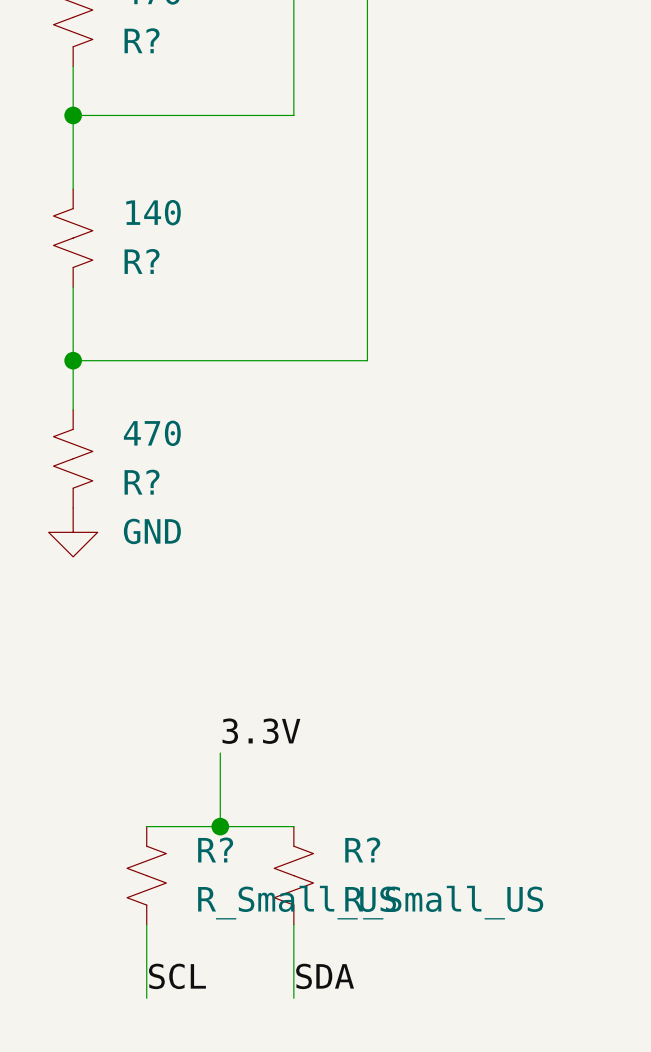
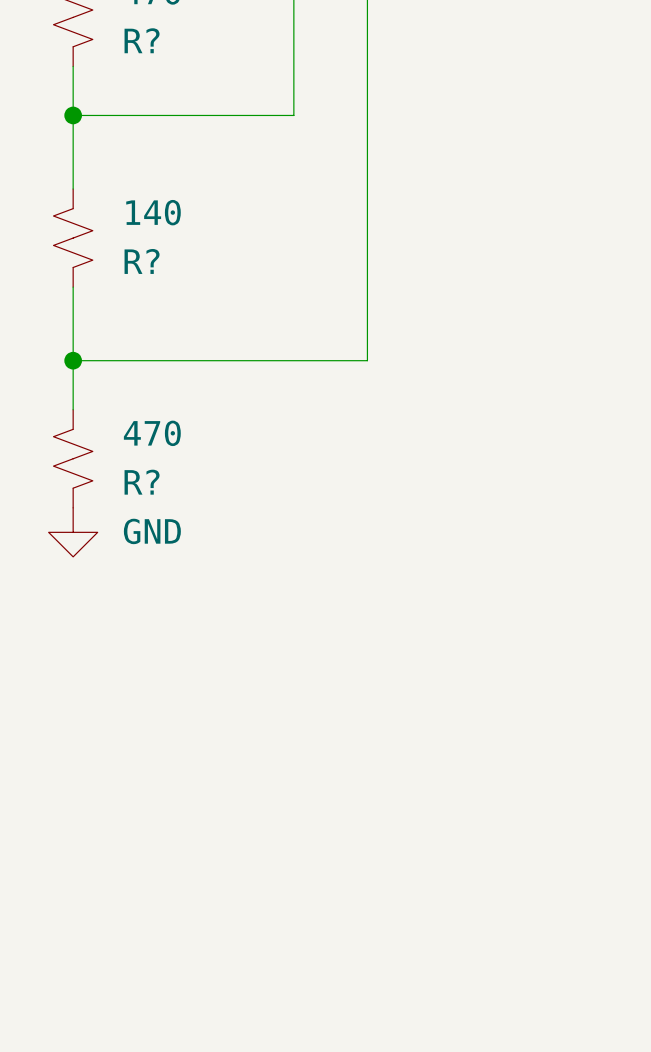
label: 3.3V (261, 731) -> none
wire: (220, 753) (220, 826) -> none
wire: (146, 826) (293, 826) -> none
junction: (220, 826) -> none
R?: R_Small_US (146, 875) -> none
R?: R_Small_US (293, 875) -> none
wire: (146, 924) (146, 998) -> none
wire: (293, 924) (293, 998) -> none
label: SCL (177, 976) -> none
label: SDA (325, 976) -> none

